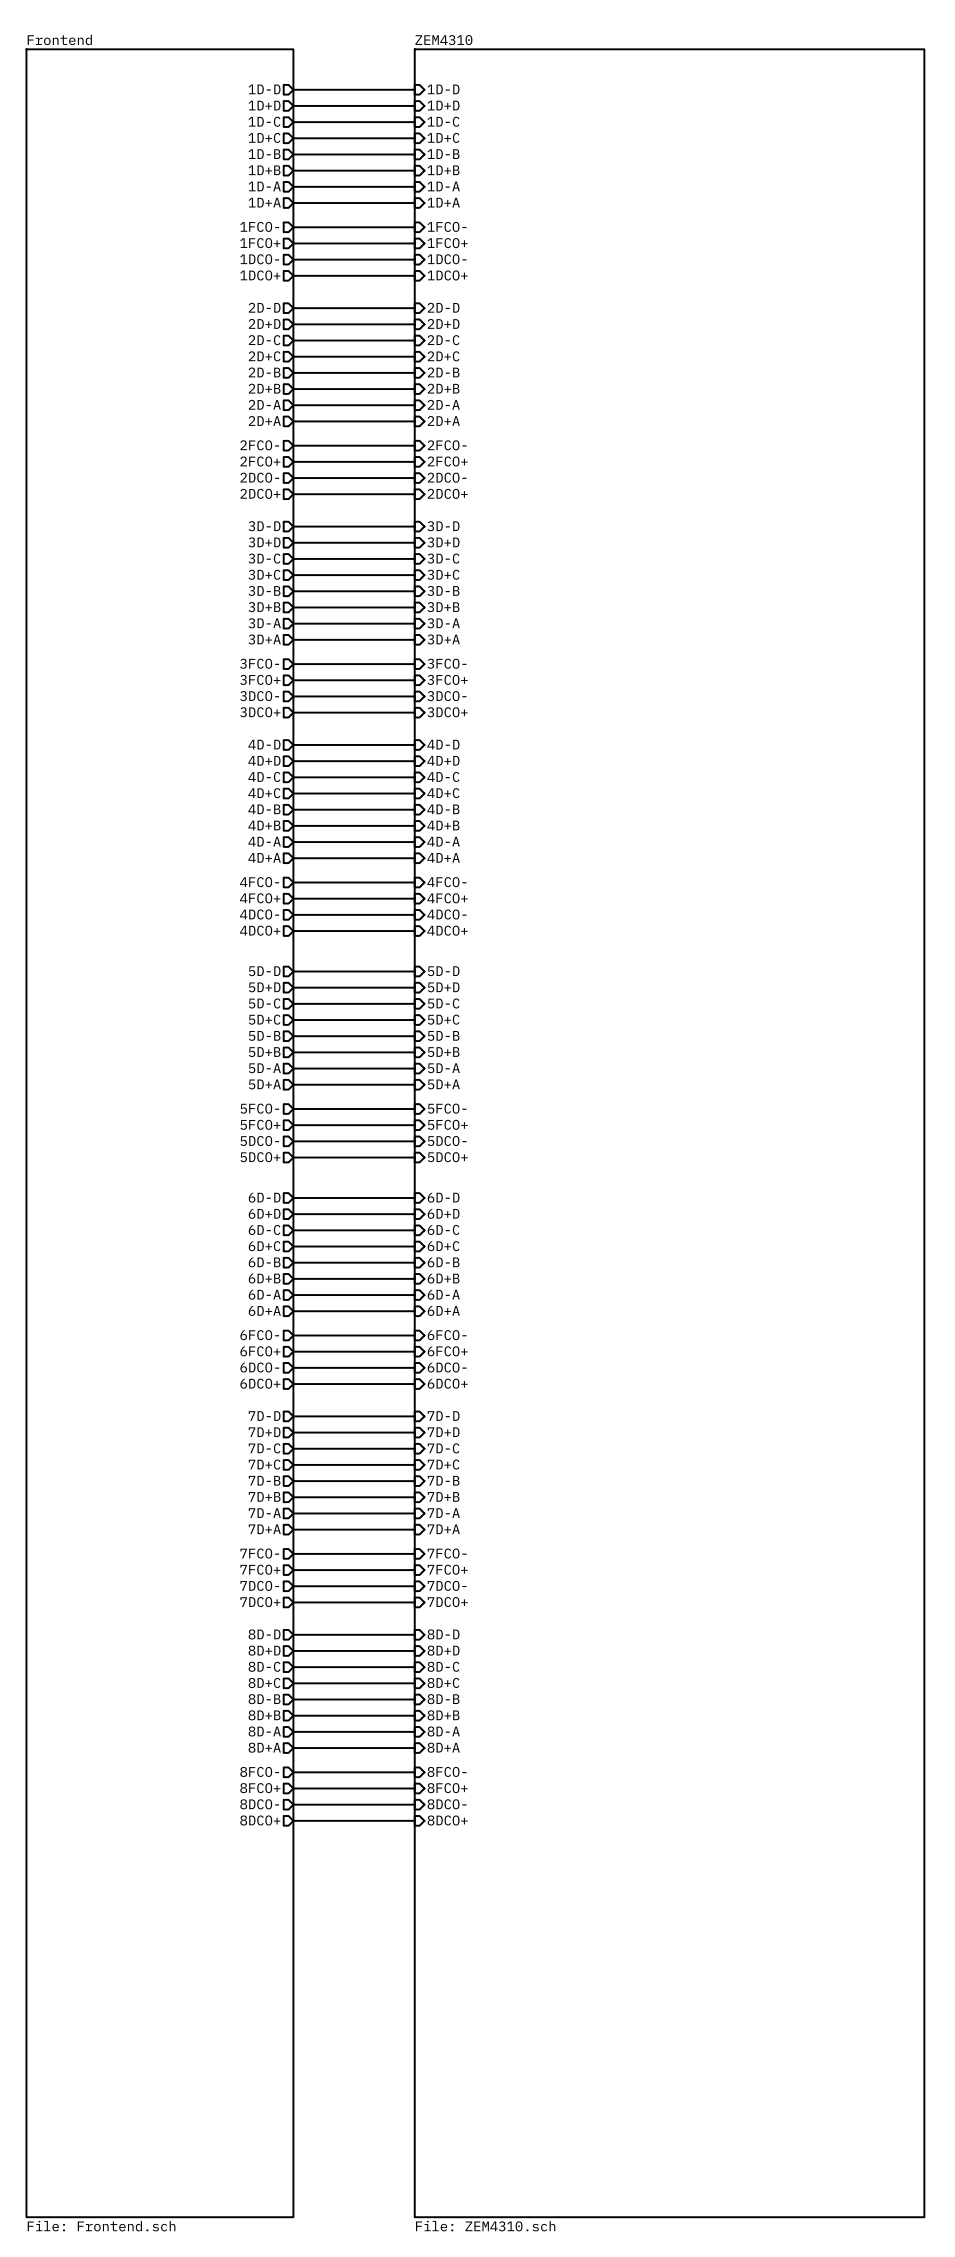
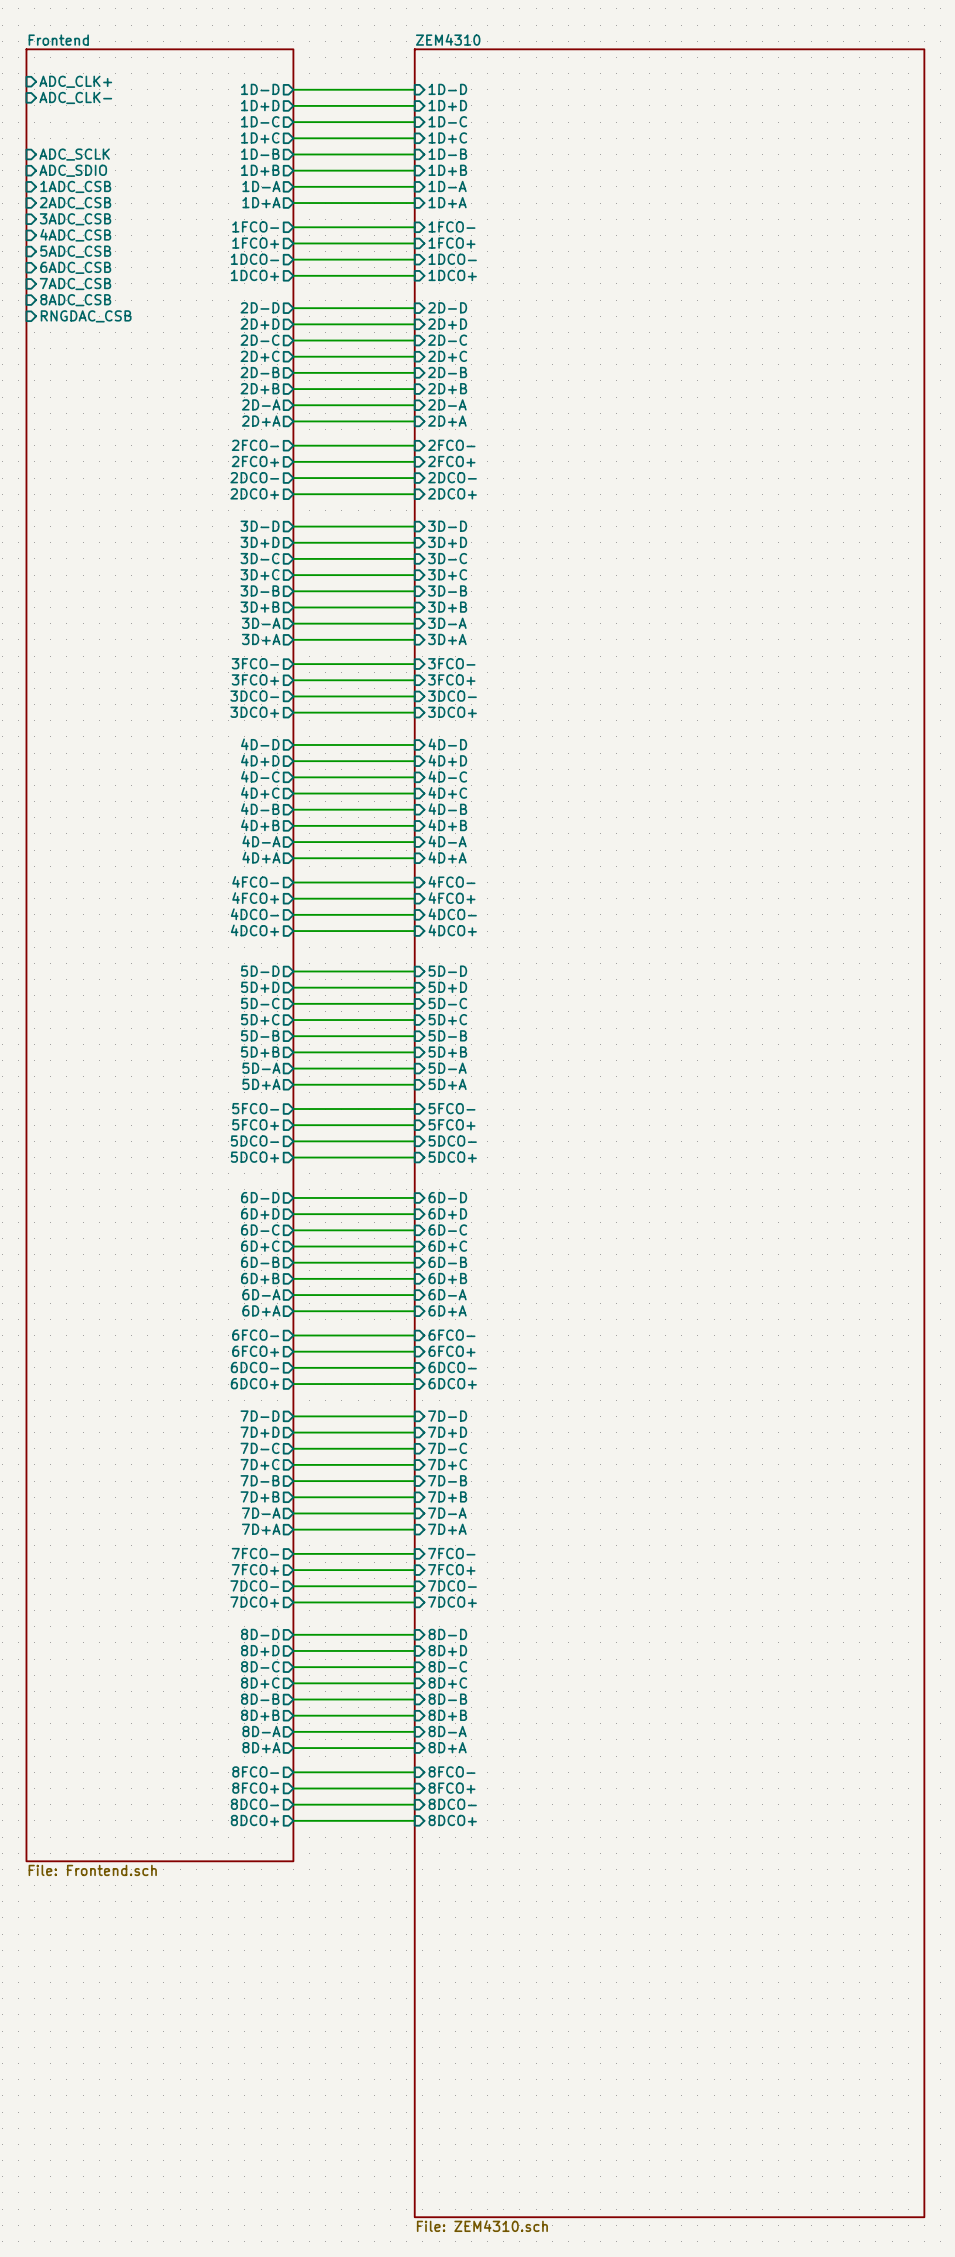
sheet pin: none -> ADC_CLK+ (75, 81)
sheet pin: none -> ADC_CLK- (75, 97)
sheet pin: none -> ADC_SCLK (74, 154)
sheet pin: none -> ADC_SDIO (73, 170)
sheet pin: none -> 1ADC_CSB (75, 186)
sheet pin: none -> 2ADC_CSB (75, 203)
sheet pin: none -> 3ADC_CSB (75, 219)
sheet pin: none -> 4ADC_CSB (75, 235)
sheet pin: none -> 5ADC_CSB (75, 251)
sheet pin: none -> 6ADC_CSB (75, 267)
sheet pin: none -> 7ADC_CSB (75, 284)
sheet pin: none -> 8ADC_CSB (75, 300)
sheet pin: none -> RNGDAC_CSB (86, 316)
sheet Frontend: none -> File: Frontend.sch (159, 955)
sheet Frontend: File: Frontend.sch (159, 1133) -> none

